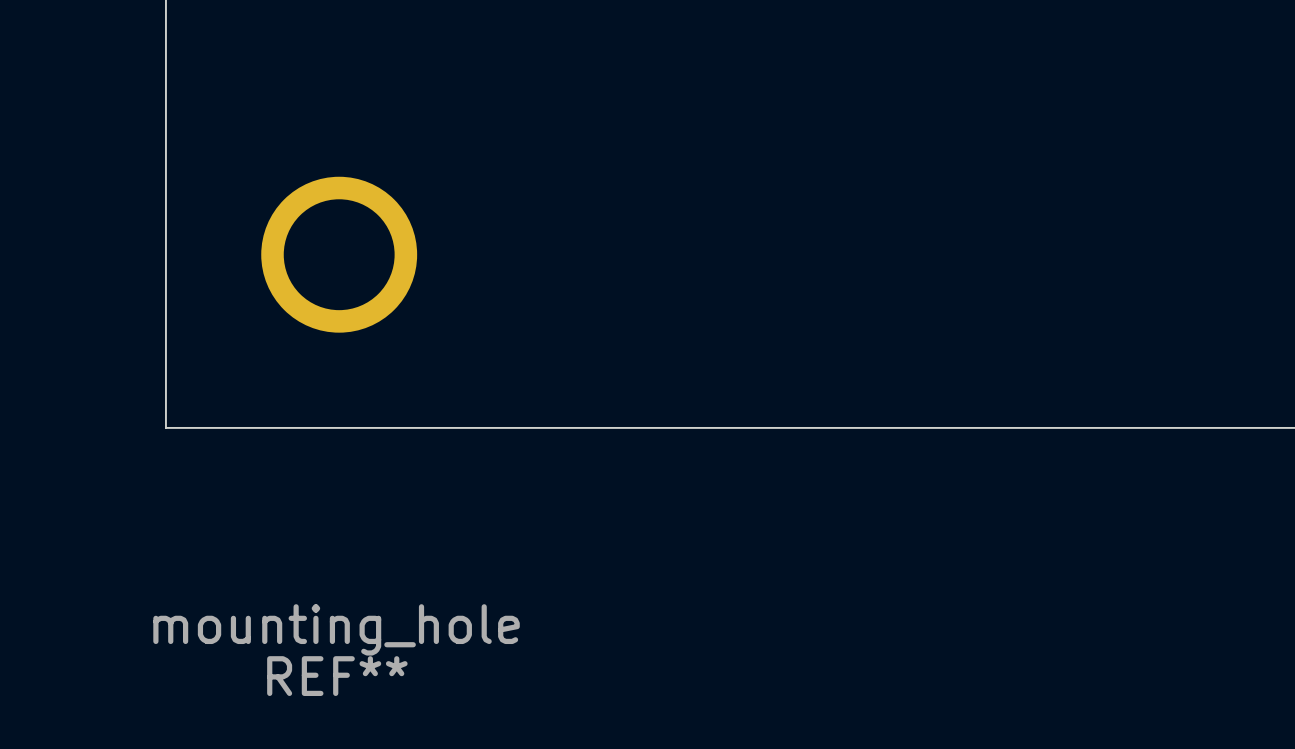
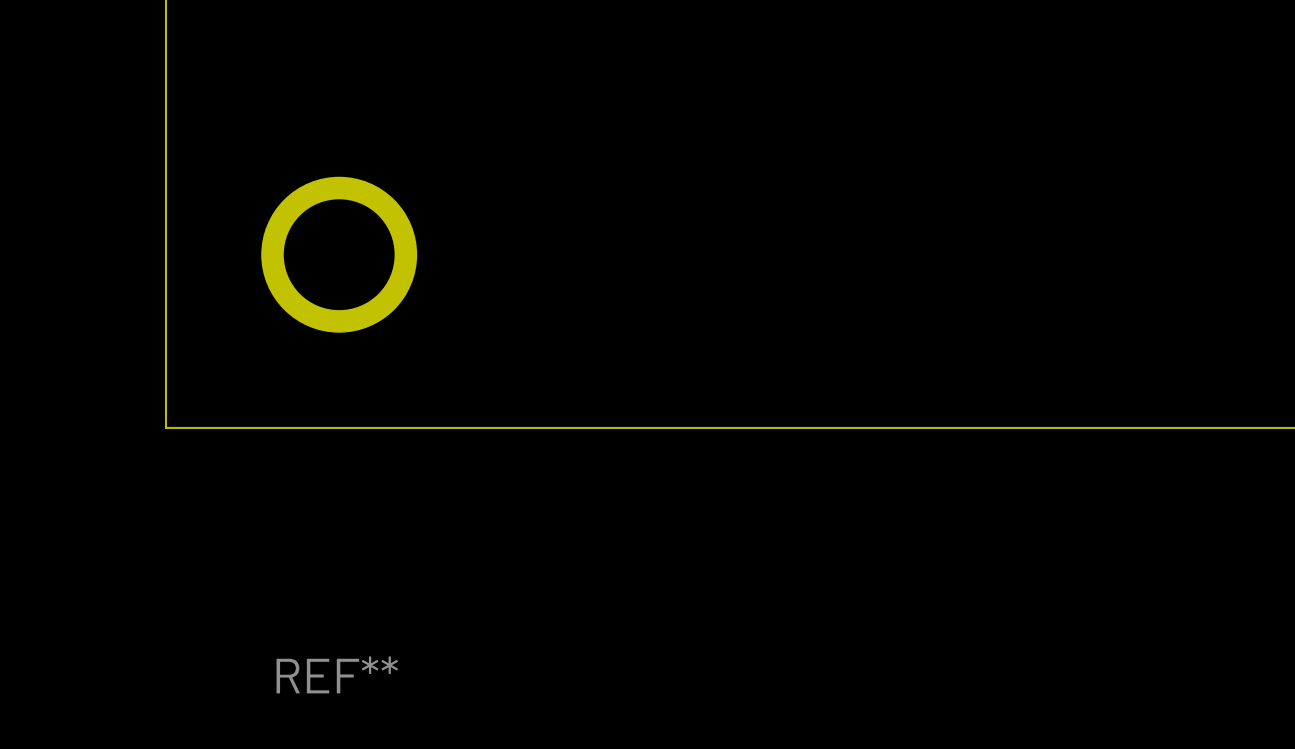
REF** value: mounting_hole (336, 629) -> none

